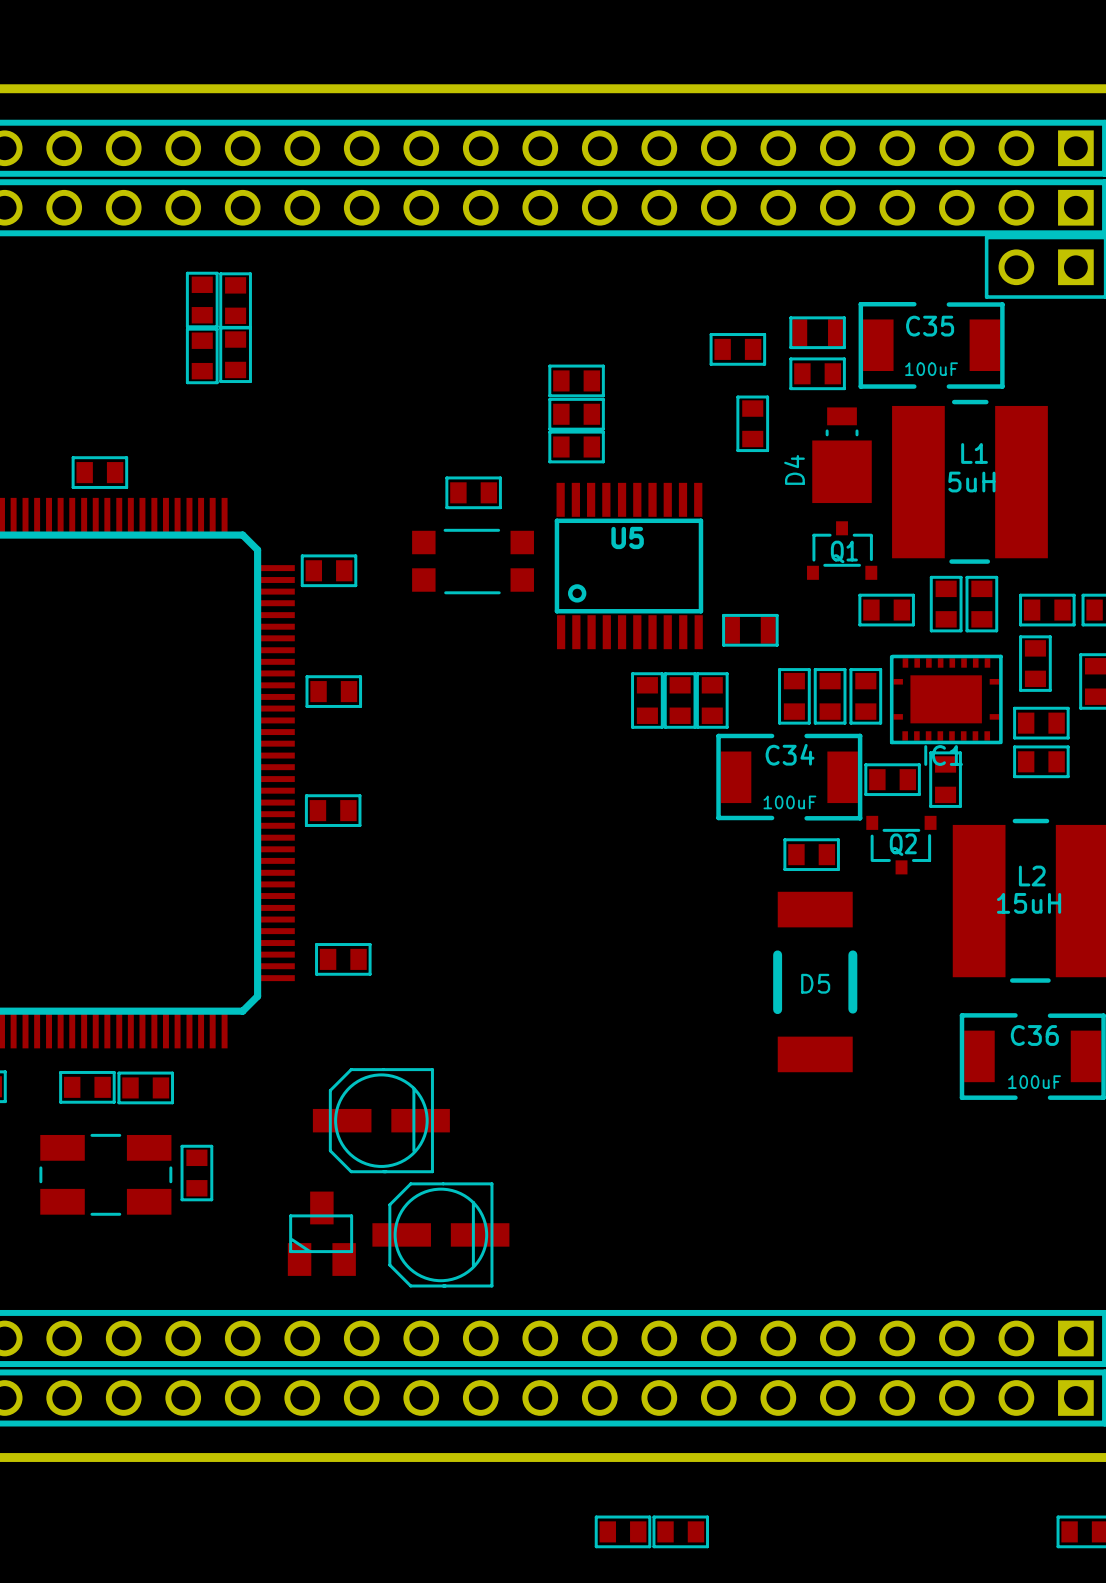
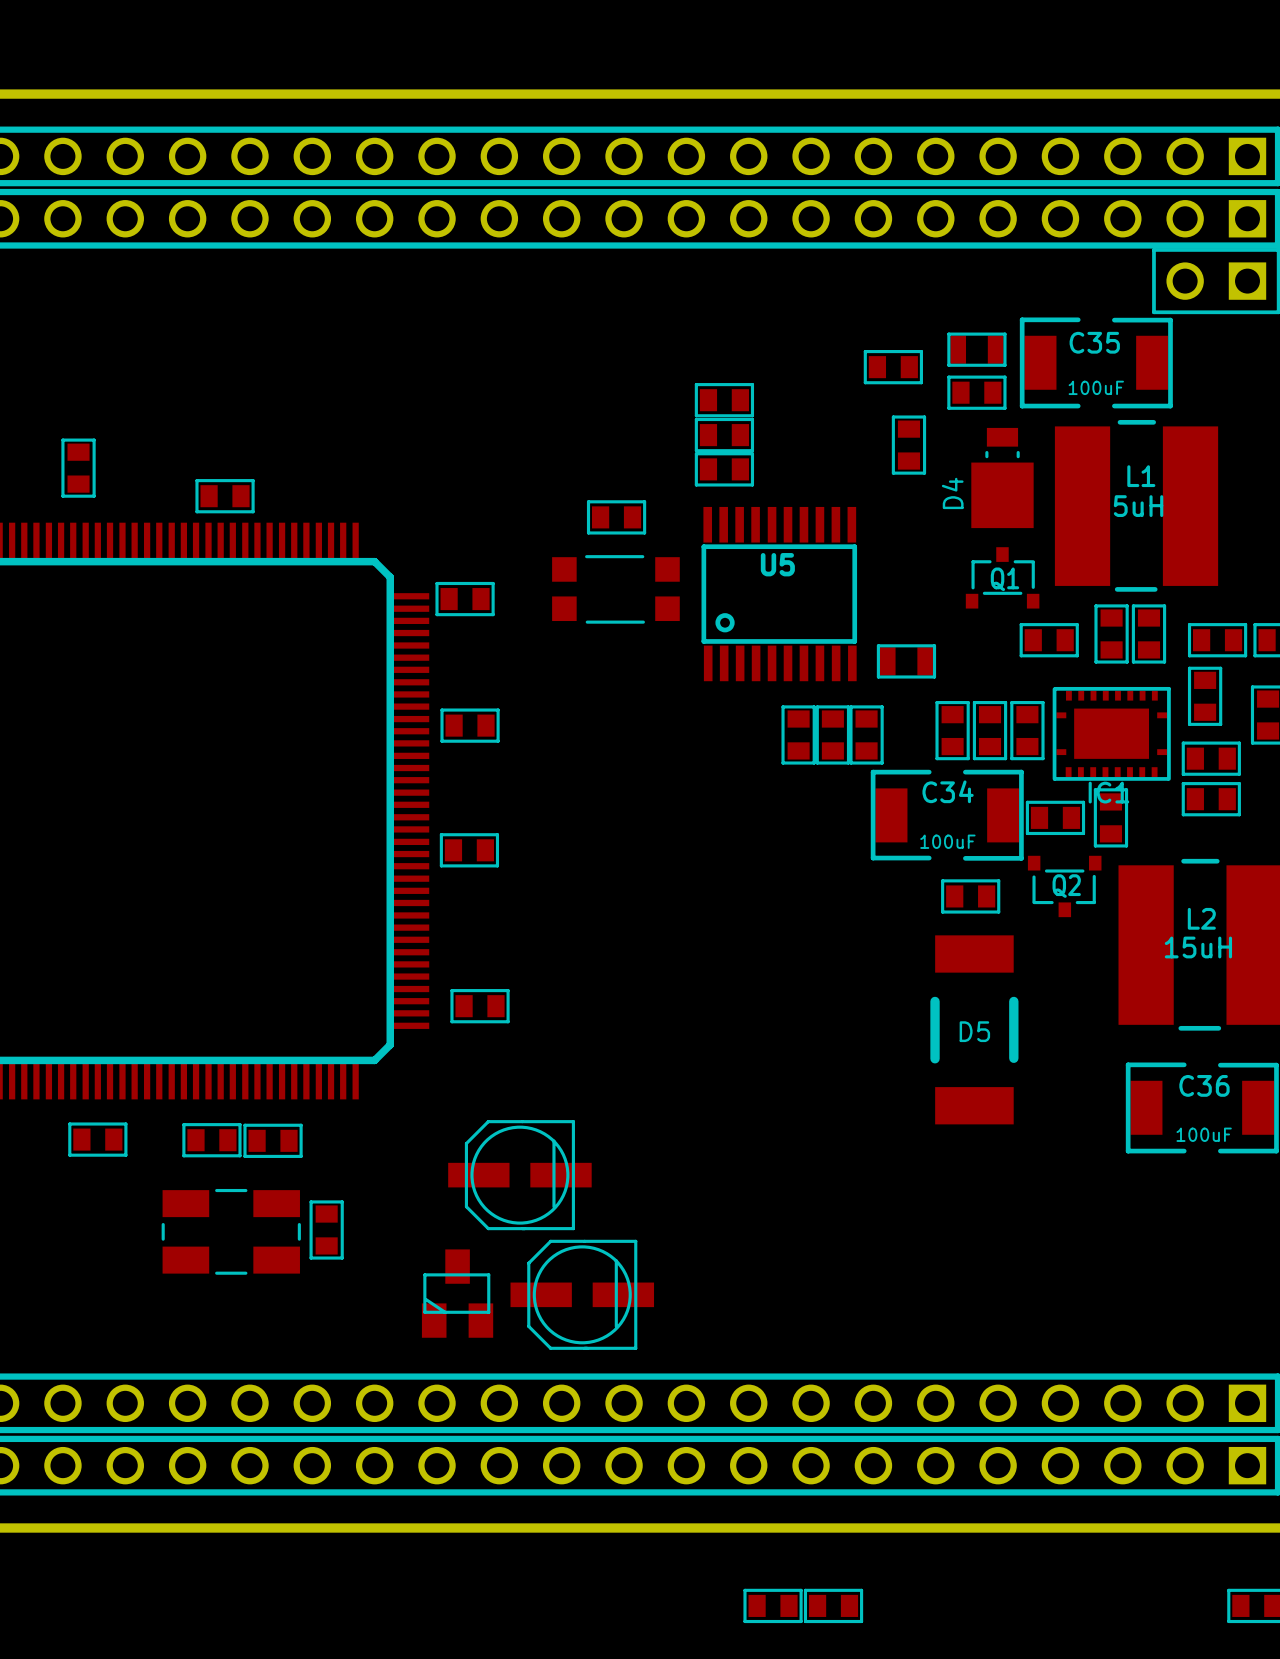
part: (202, 300) -> none
part: (235, 300) -> none
part: (235, 354) -> none
part: (202, 355) -> none

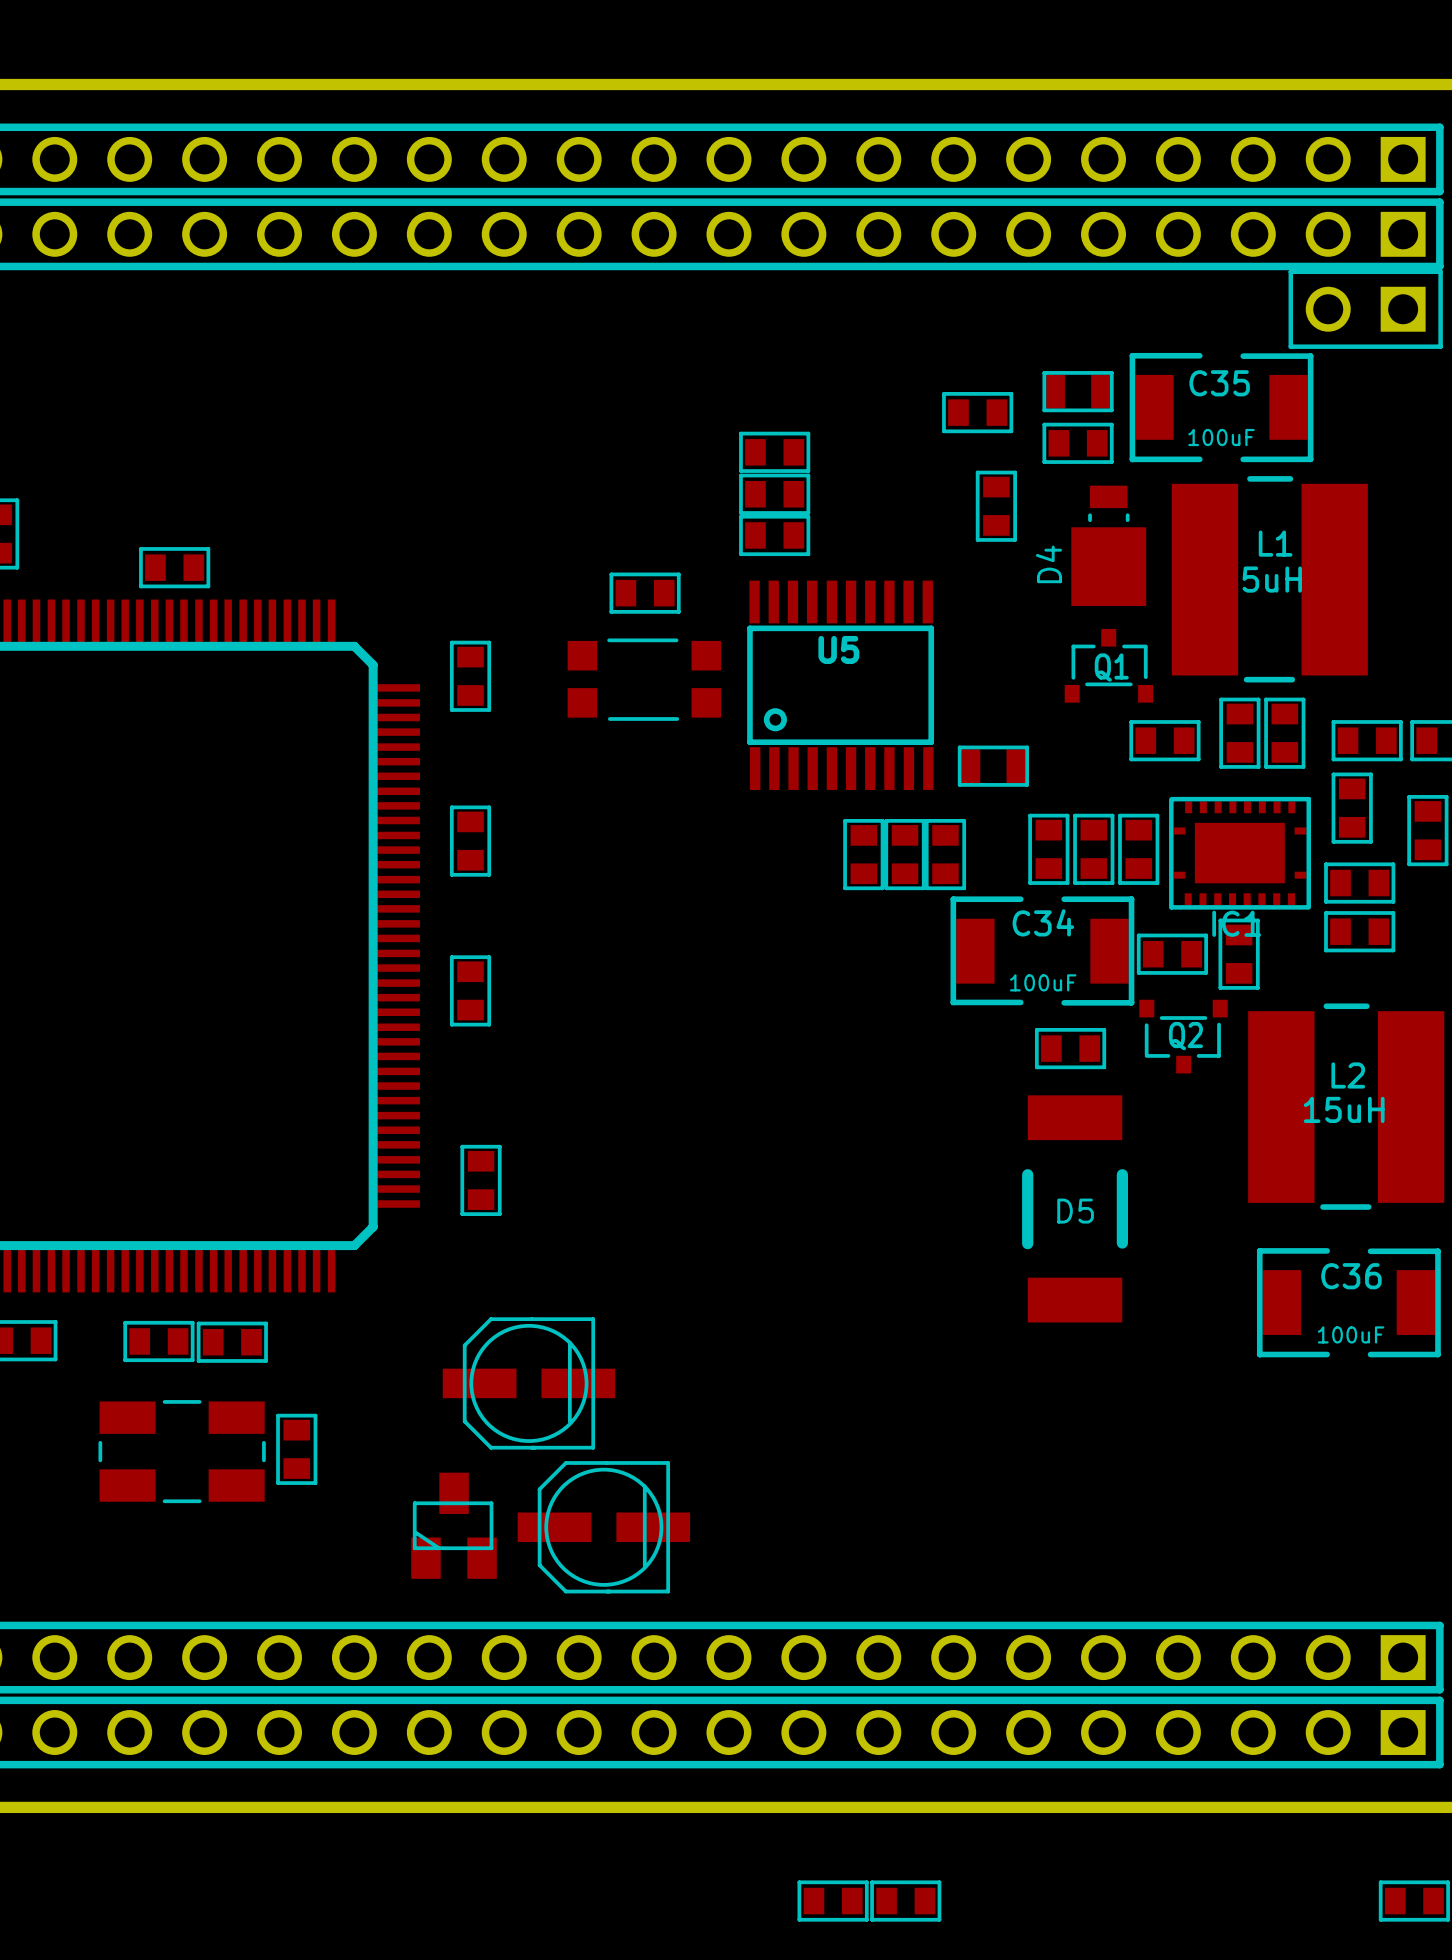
part rotation: 0° (465, 599) -> 90° clockwise (470, 676)
part rotation: 0° (470, 725) -> 90° clockwise (470, 841)
part rotation: 0° (469, 850) -> 90° clockwise (470, 990)
part rotation: 0° (480, 1006) -> 90° clockwise (481, 1180)

